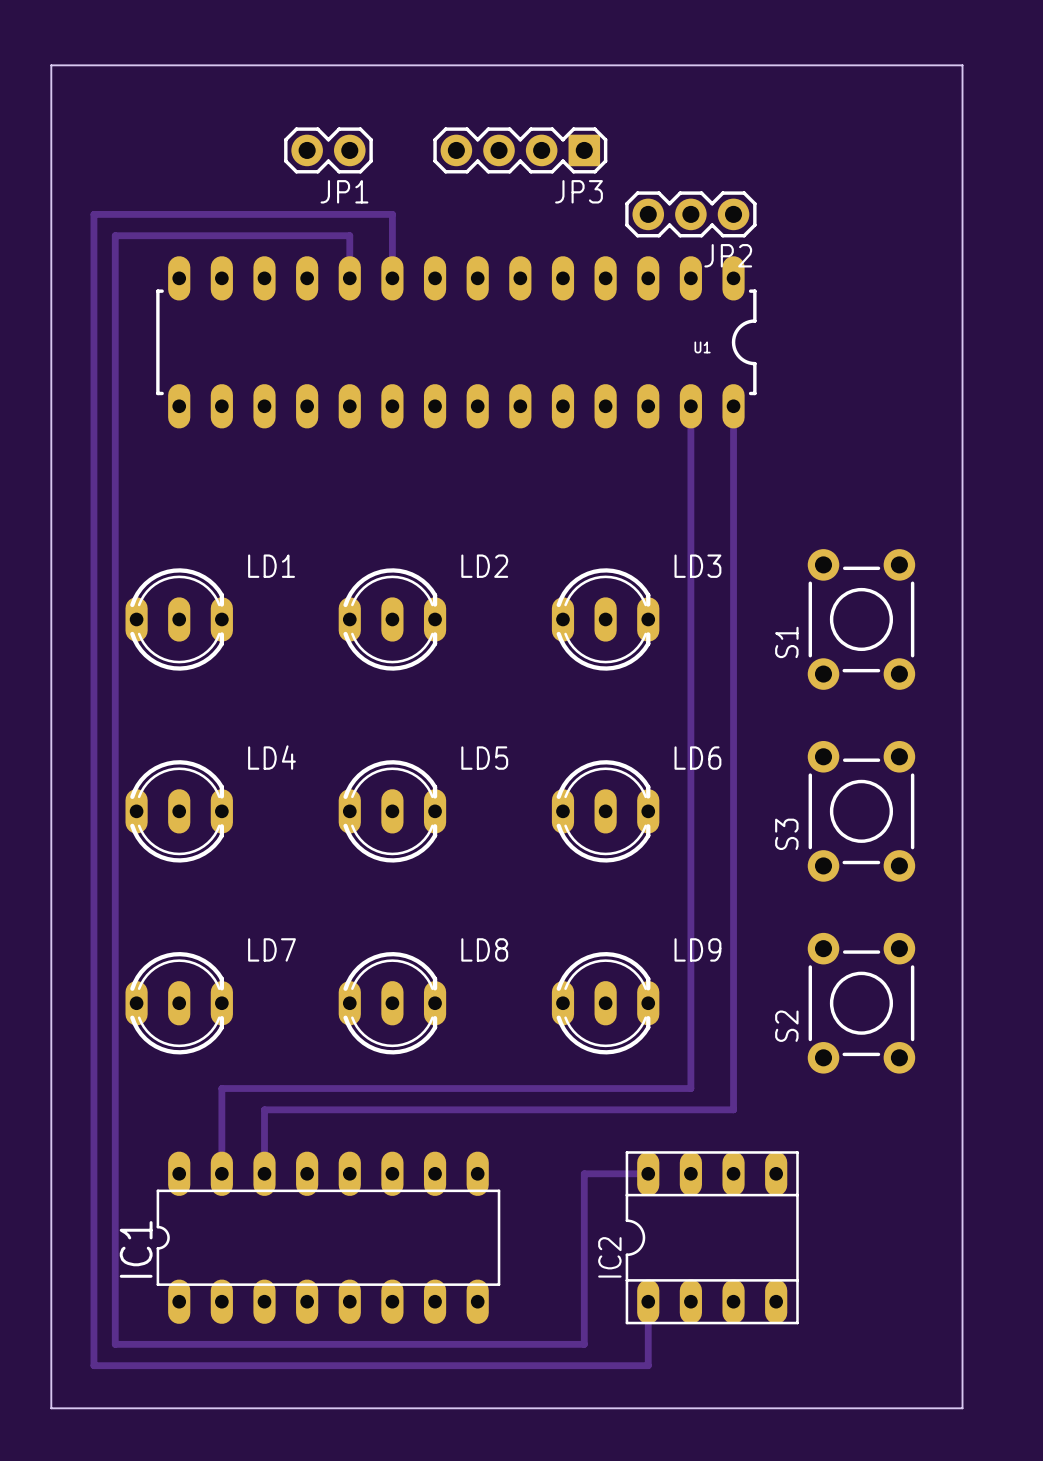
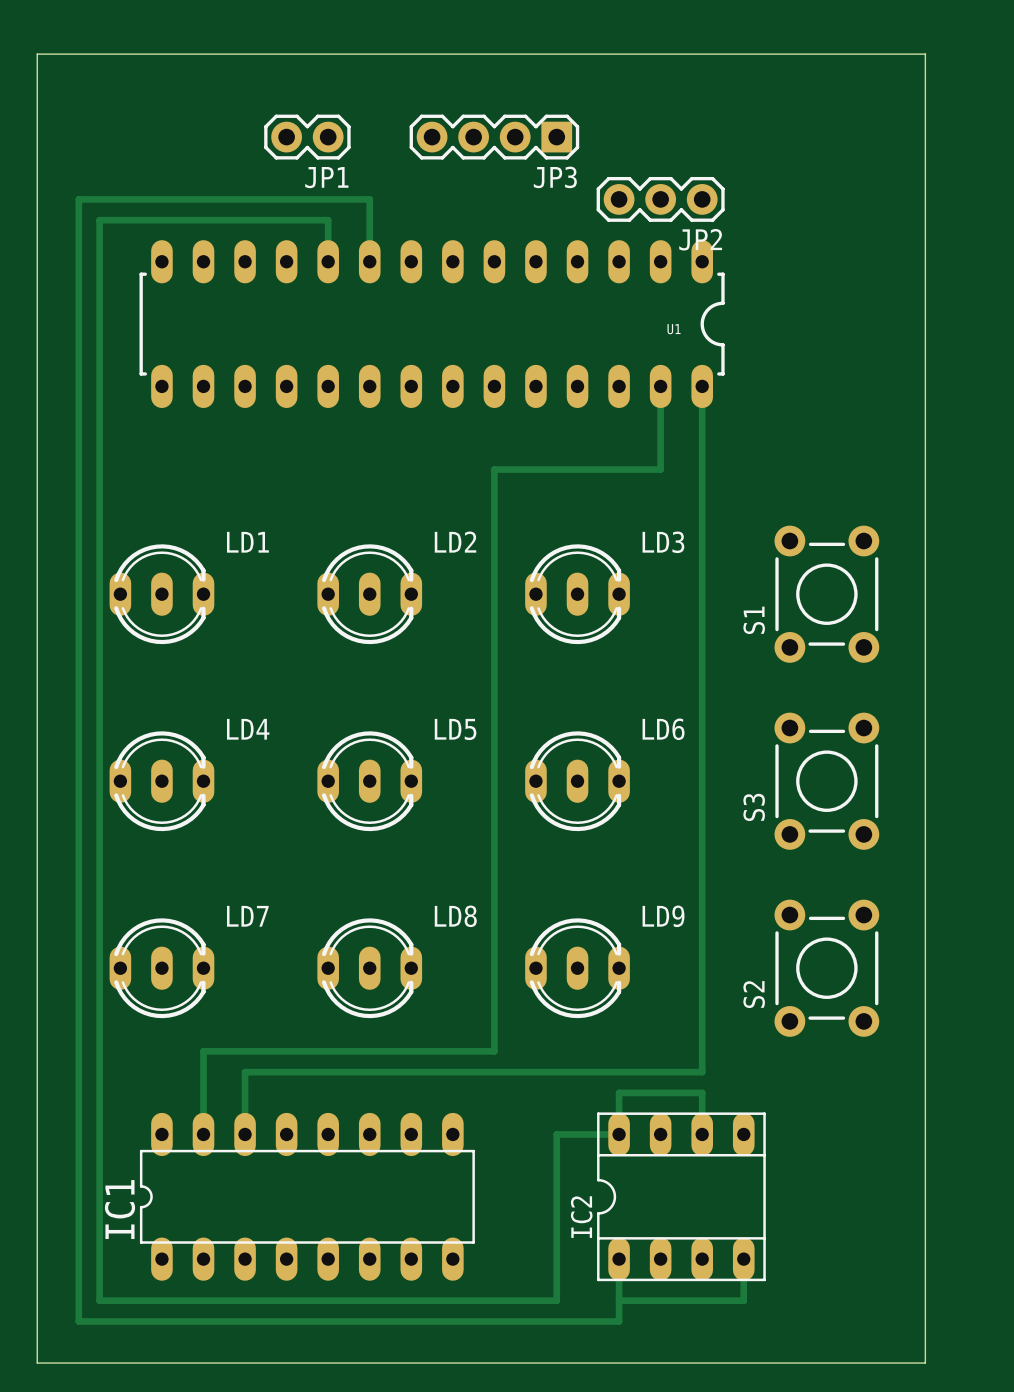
track: (690, 491) (690, 1088) (520, 1088) -> (660, 469) (494, 469) (494, 1051)
track: none -> (619, 1134) (619, 1092) (702, 1092) (702, 1134)
track: none -> (743, 1259) (743, 1300) (619, 1300)

